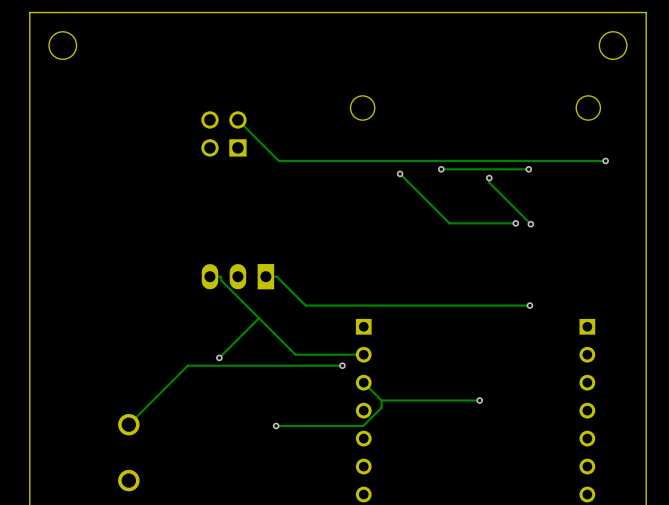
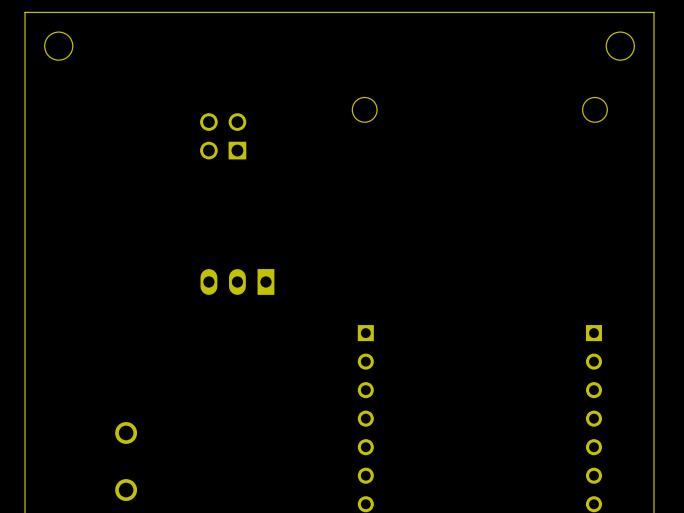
track: (237, 119) (278, 160) (605, 160) -> none
via: (605, 160) -> none
via: (441, 169) -> none
track: (528, 169) (441, 169) -> none
via: (528, 169) -> none
track: (400, 173) (449, 223) (515, 223) -> none
via: (400, 173) -> none
track: (489, 178) (489, 182) (530, 224) -> none
via: (489, 178) -> none
via: (515, 223) -> none
via: (530, 224) -> none
track: (209, 276) (220, 276) (220, 280) (295, 354) (363, 354) -> none
track: (265, 276) (276, 276) (305, 305) (529, 305) -> none
via: (529, 305) -> none
track: (259, 318) (219, 357) -> none
via: (219, 357) -> none
track: (342, 365) (187, 365) (128, 424) -> none
via: (342, 365) -> none
track: (363, 382) (381, 400) -> none
track: (381, 400) (381, 407) (363, 425) (276, 425) -> none
track: (479, 400) (381, 400) -> none
via: (479, 400) -> none
via: (276, 425) -> none

